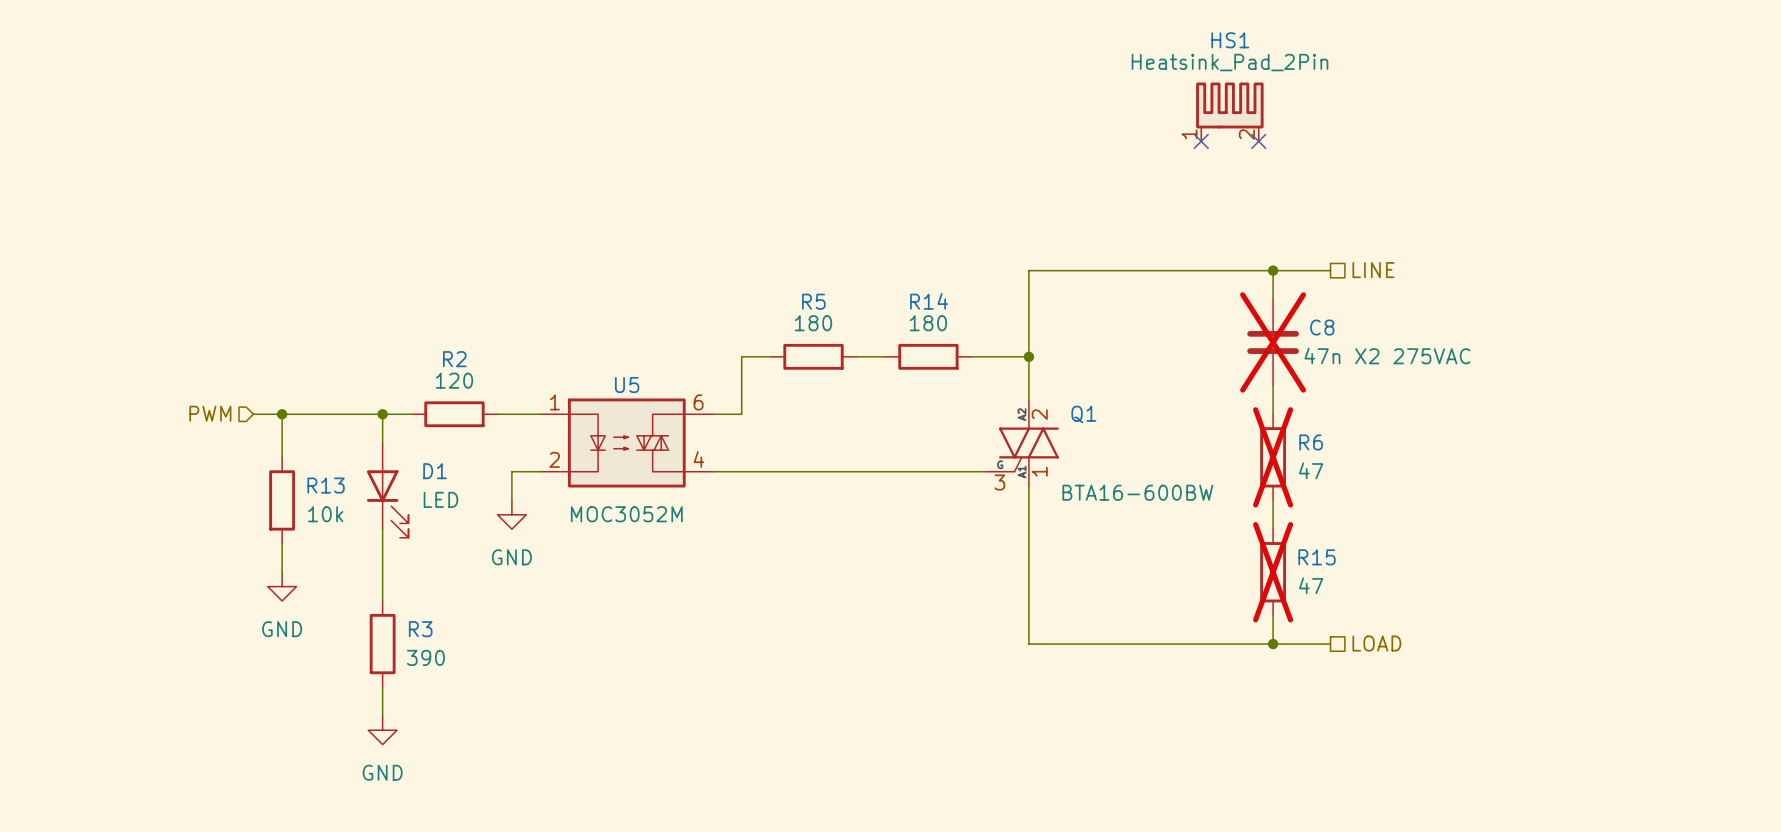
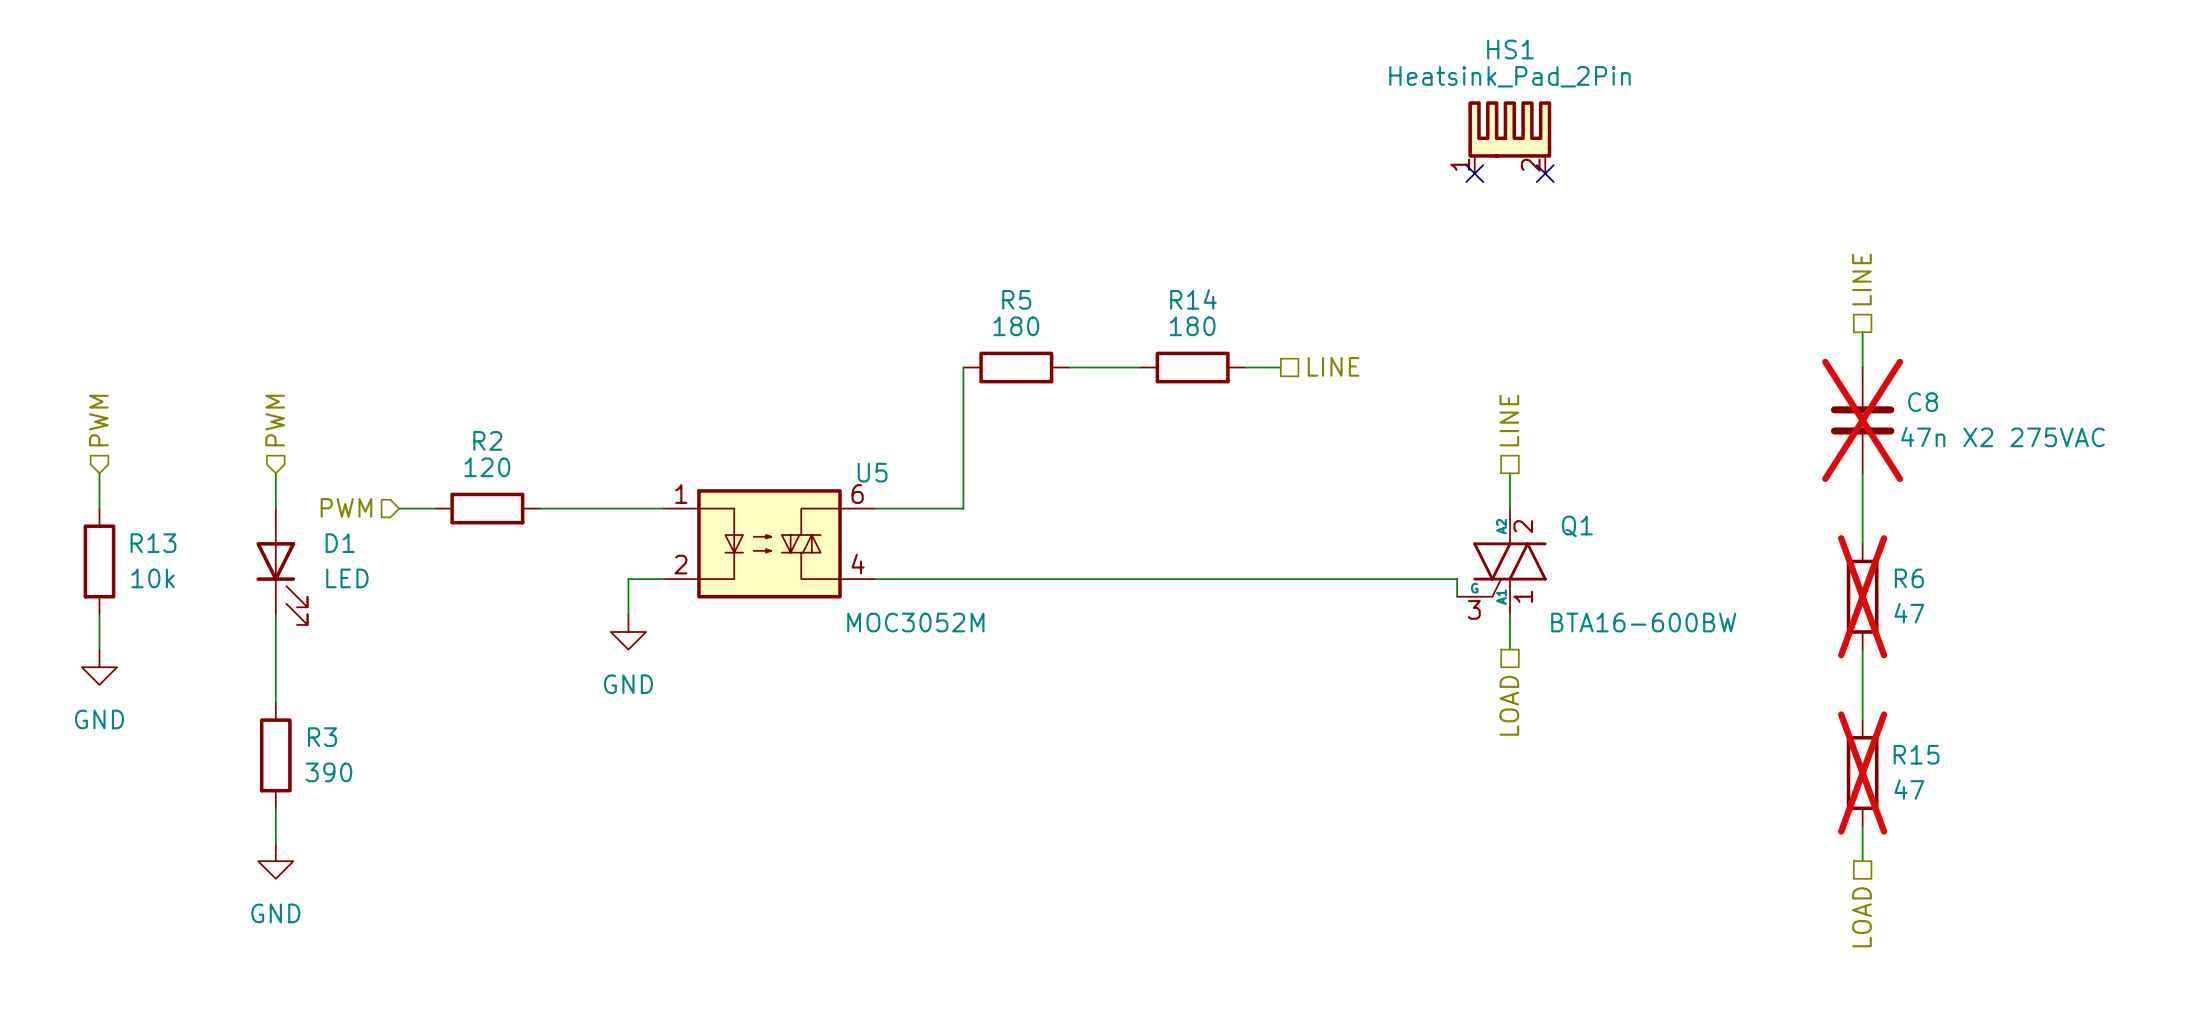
hierarchical label: none -> LINE (1861, 279)
wire: (1273, 270) (1273, 299) -> (1862, 332) (1862, 367)
junction: (1273, 270) -> none
wire: (1330, 270) (1028, 270) (1028, 399) -> none
hierarchical label: LINE (1373, 270) -> none
hierarchical label: none -> LINE (1333, 366)
hierarchical label: none -> PWM (98, 420)
hierarchical label: none -> PWM (275, 420)
hierarchical label: none -> LINE (1509, 420)
C8 position: (1273, 342) -> (1862, 420)
wire: (770, 356) (741, 356) (741, 414) -> (963, 367) (963, 508) (910, 508)
R5 position: (813, 356) -> (1016, 367)
wire: (856, 356) (885, 356) -> (1245, 367) (1280, 367)
R14 position: (928, 356) -> (1192, 367)
wire: (971, 356) (1028, 356) -> (1069, 367) (1139, 367)
junction: (1028, 356) -> none
wire: none -> (99, 473) (99, 508)
U5 name position: U5 (627, 385) -> U5 (872, 472)
wire: (1273, 385) (1273, 414) -> (1510, 473) (1510, 508)
wire: none -> (1862, 473) (1862, 543)
hierarchical label: PWM (210, 413) -> none
hierarchical label: none -> PWM (346, 507)
wire: (253, 414) (325, 414) -> none
wire: (282, 414) (282, 457) -> none
junction: (282, 414) -> none
wire: (353, 414) (411, 414) -> (540, 508) (610, 508)
wire: (382, 414) (382, 442) -> (275, 473) (275, 508)
junction: (382, 414) -> none
R2 position: (454, 414) -> (487, 508)
Q1 position: (1022, 442) -> (1501, 561)
R6 position: (1273, 457) -> (1862, 596)
wire: none -> (1210, 579) (1457, 579) (1457, 596)
wire: (1028, 486) (1028, 644) (1330, 644) -> none
D1 position: (387, 490) -> (281, 566)
R13 position: (282, 500) -> (99, 561)
wire: (1273, 500) (1273, 529) -> (1510, 614) (1510, 649)
U5 value position: MOC3052M (626, 514) -> MOC3052M (915, 622)
wire: (382, 529) (382, 600) -> (275, 614) (275, 702)
wire: none -> (1862, 649) (1862, 720)
power symbol: none -> GND (99, 667)
wire: (282, 543) (282, 572) -> (99, 614) (99, 649)
R15 position: (1273, 572) -> (1862, 773)
hierarchical label: none -> LOAD (1509, 705)
power symbol: GND (282, 586) -> none
wire: (1273, 615) (1273, 644) -> (1862, 825) (1862, 861)
hierarchical label: LOAD (1376, 643) -> none
R3 position: (382, 644) -> (275, 755)
junction: (1273, 644) -> none
wire: (382, 687) (382, 715) -> (275, 808) (275, 843)
power symbol: none -> GND (275, 861)
power symbol: GND (382, 730) -> none
hierarchical label: none -> LOAD (1861, 917)

